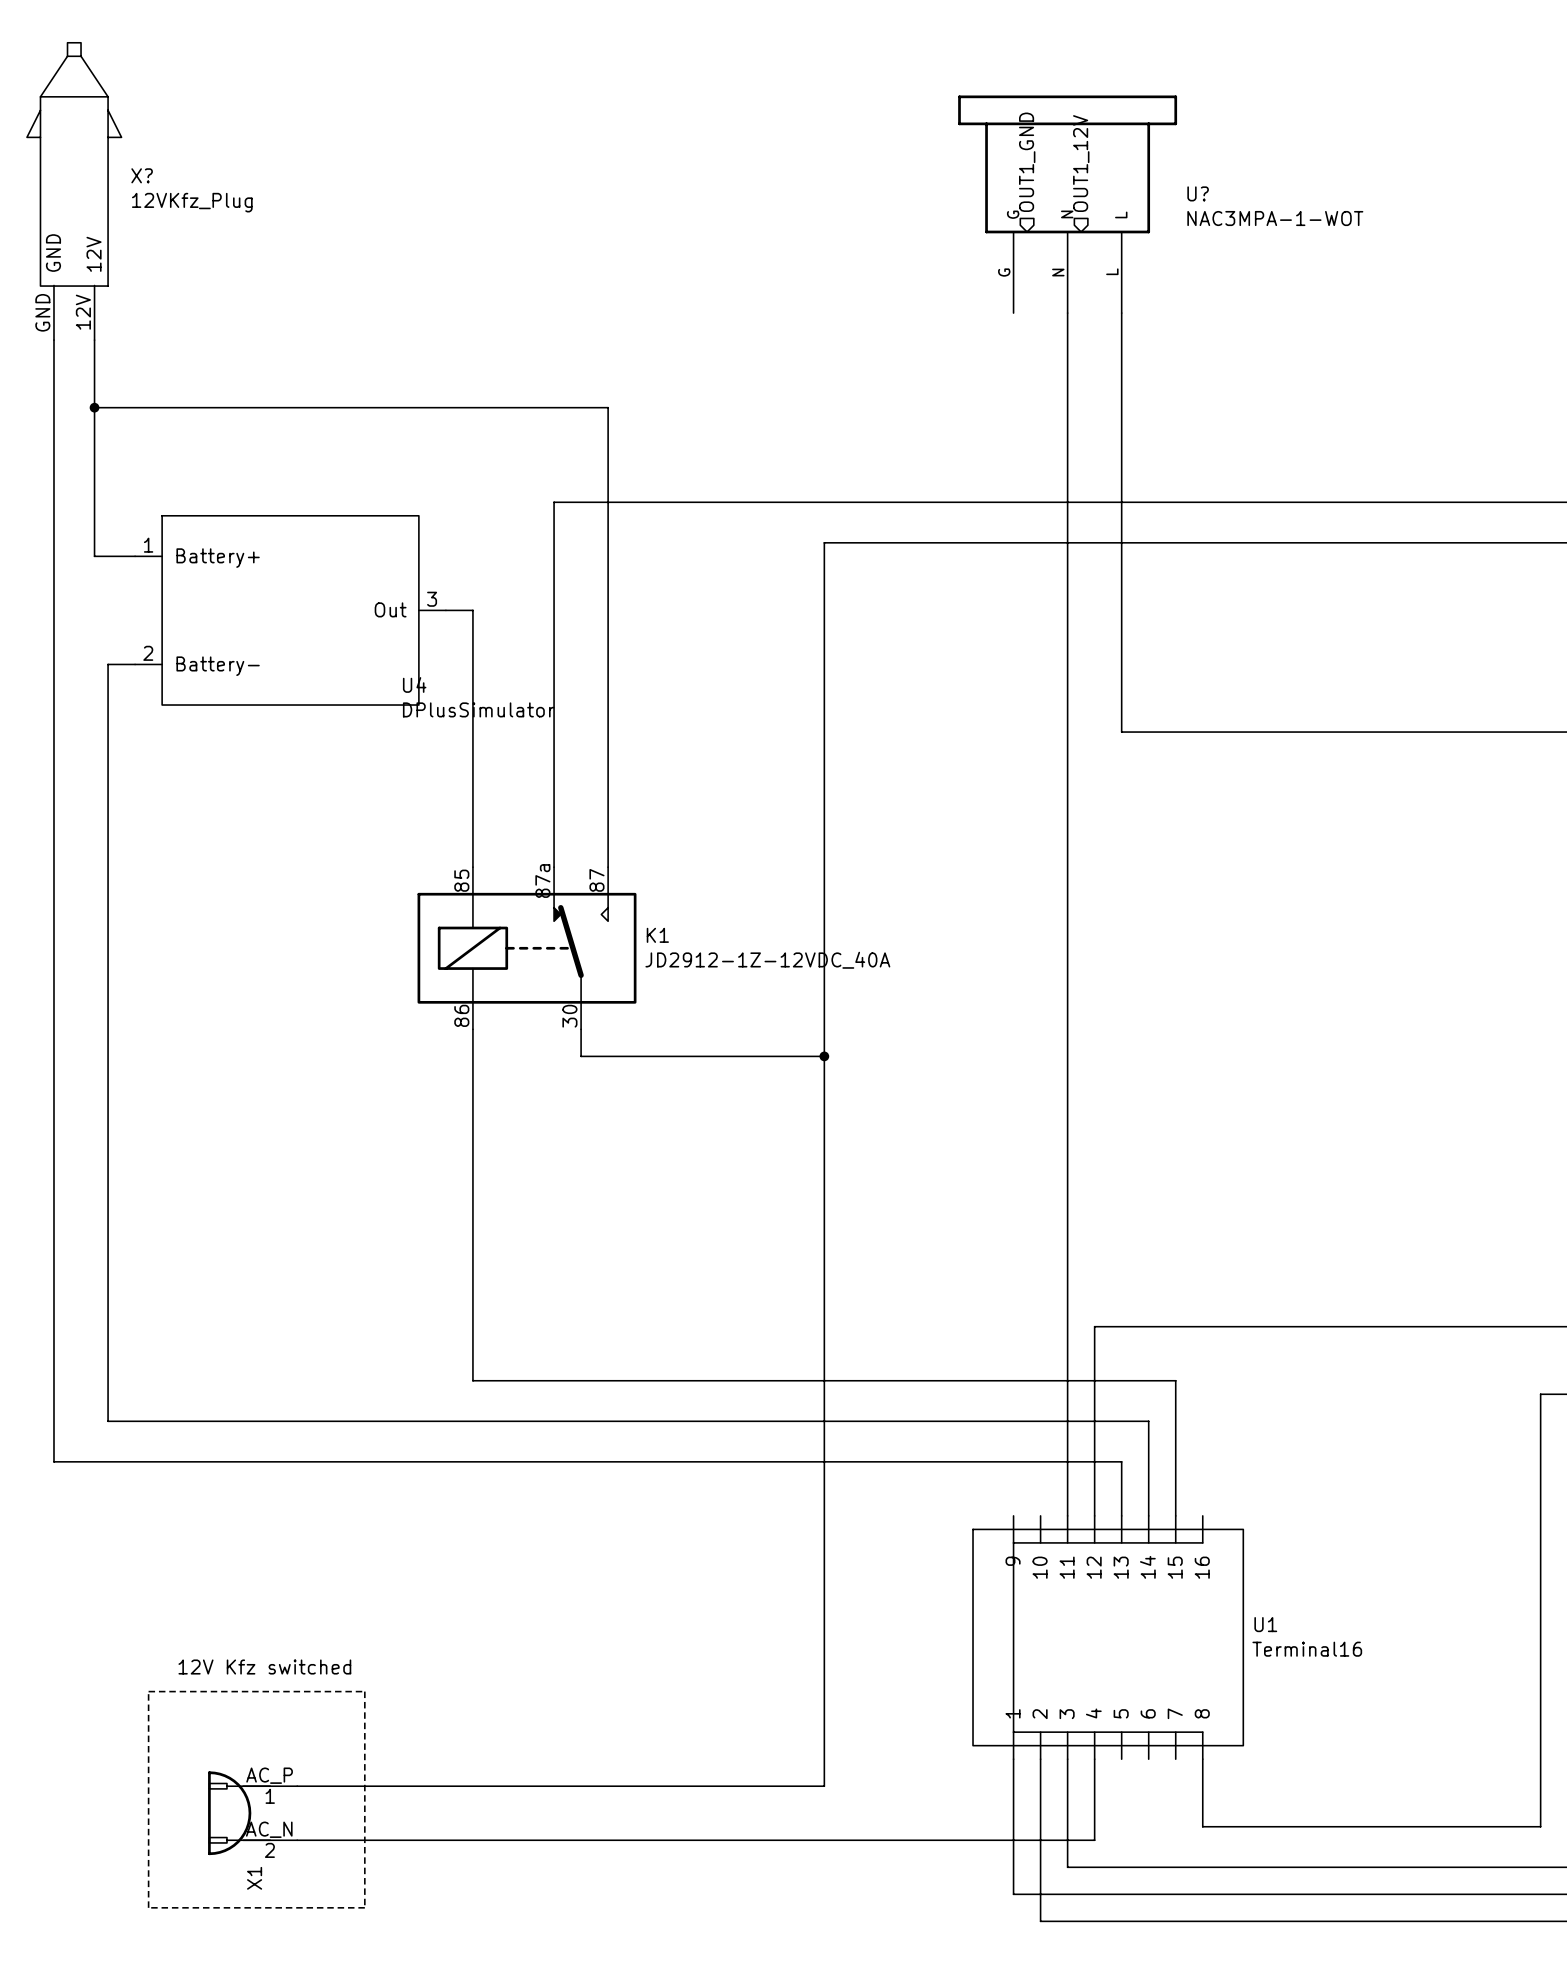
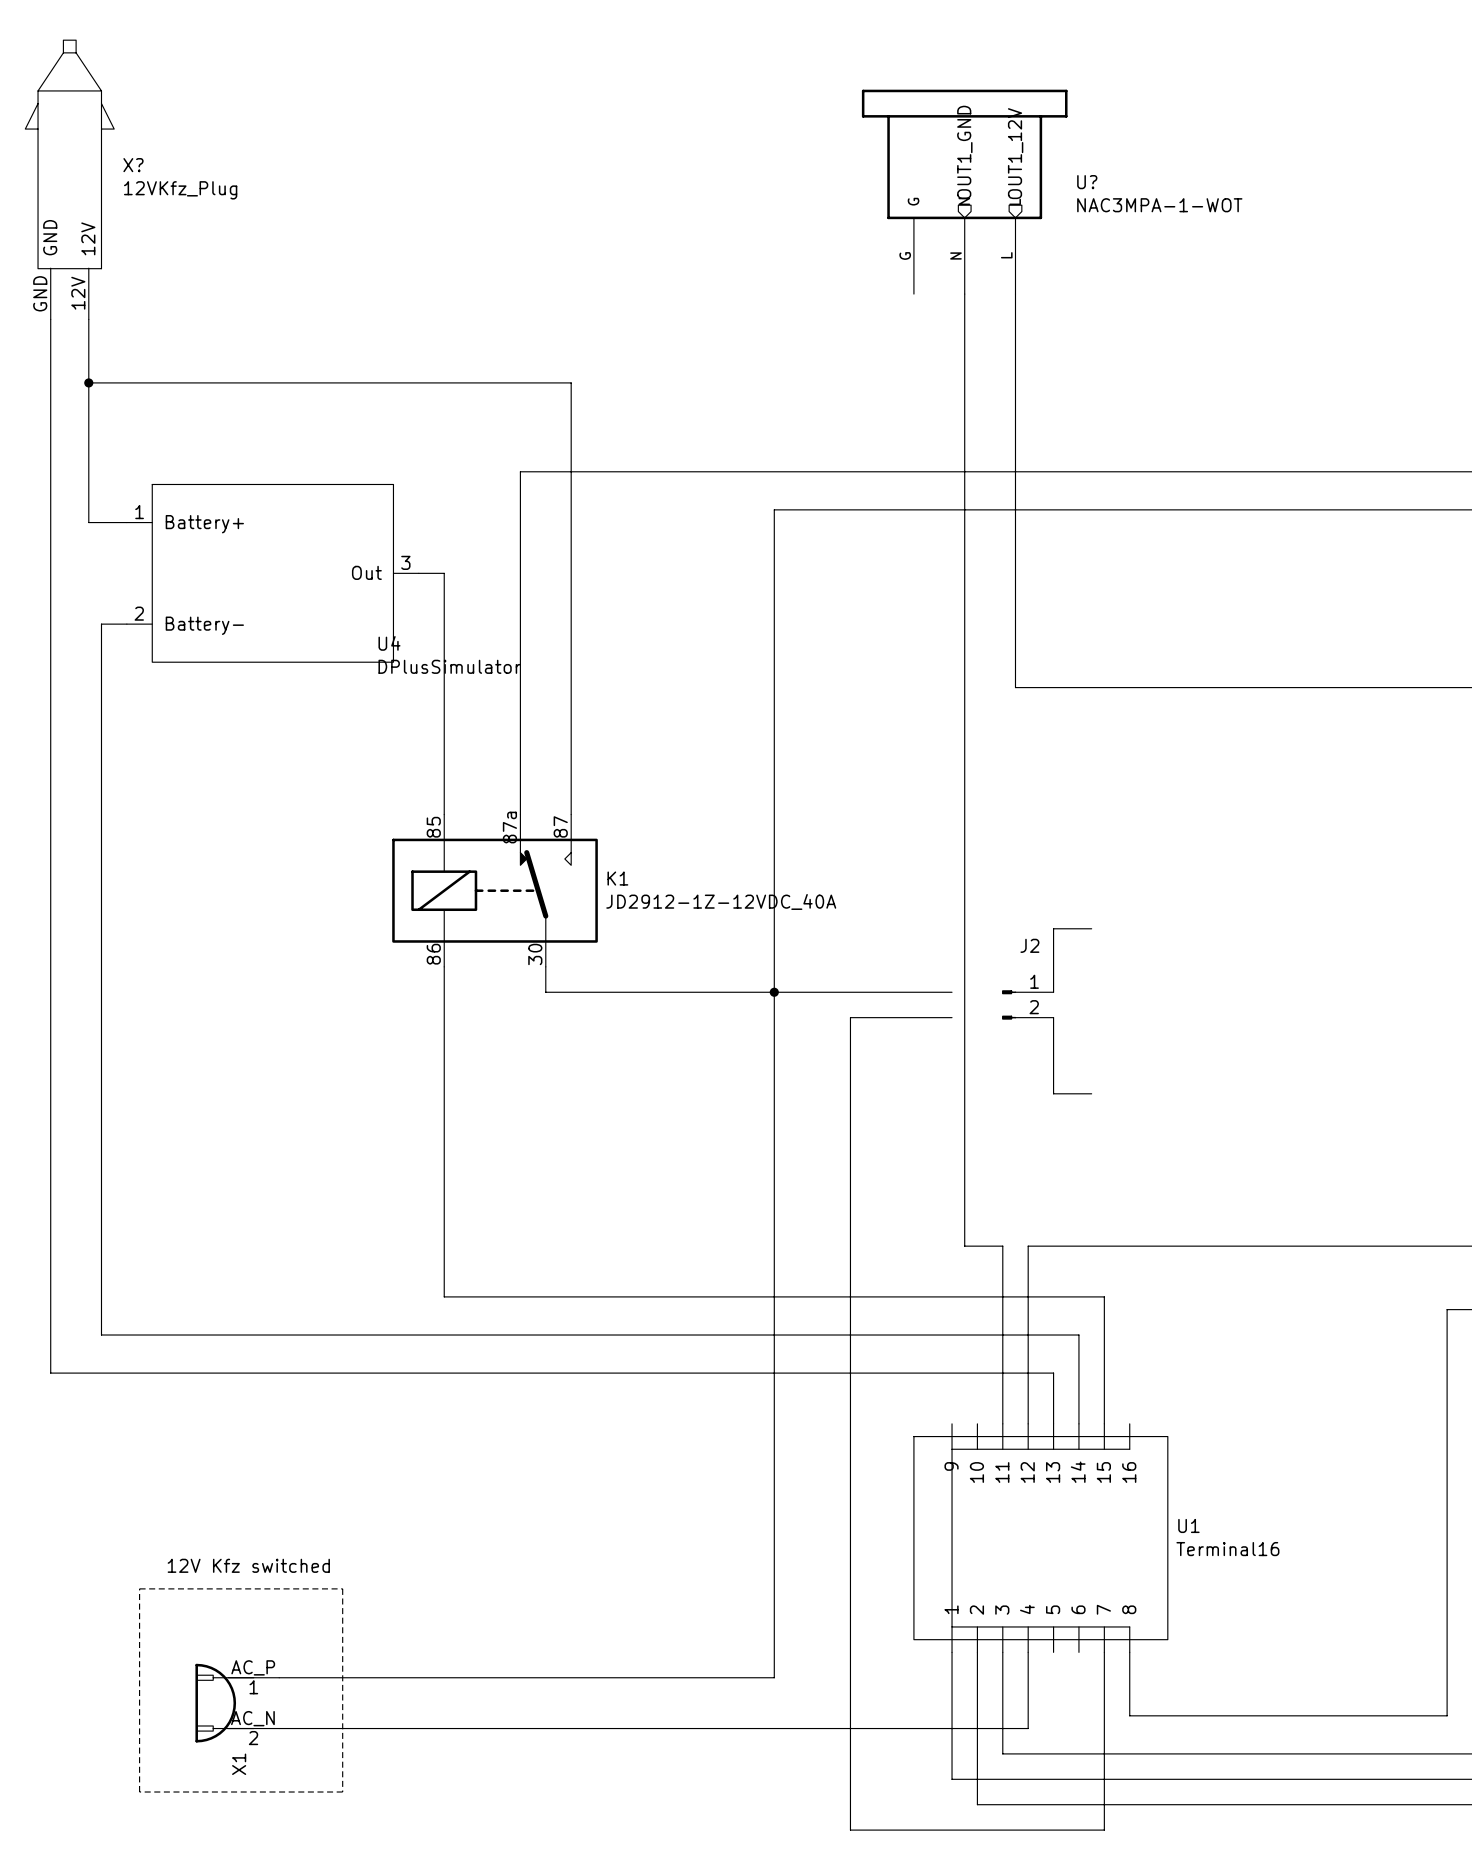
U? position: (1067, 204) -> (964, 191)
wire: (1067, 313) (1067, 1326) -> (964, 294) (964, 1246) (1002, 1246)
wire: (1121, 313) (1121, 732) -> (1015, 294) (1015, 687) (1053, 687)
wire: none -> (1091, 928) (1053, 928) (1053, 992)
wire: none -> (774, 992) (952, 992)
J2: none -> (1027, 1004)
wire: none -> (952, 1017) (850, 1017) (850, 1830) (1104, 1830) (1104, 1652)
wire: none -> (1053, 1017) (1053, 1093) (1091, 1093)

